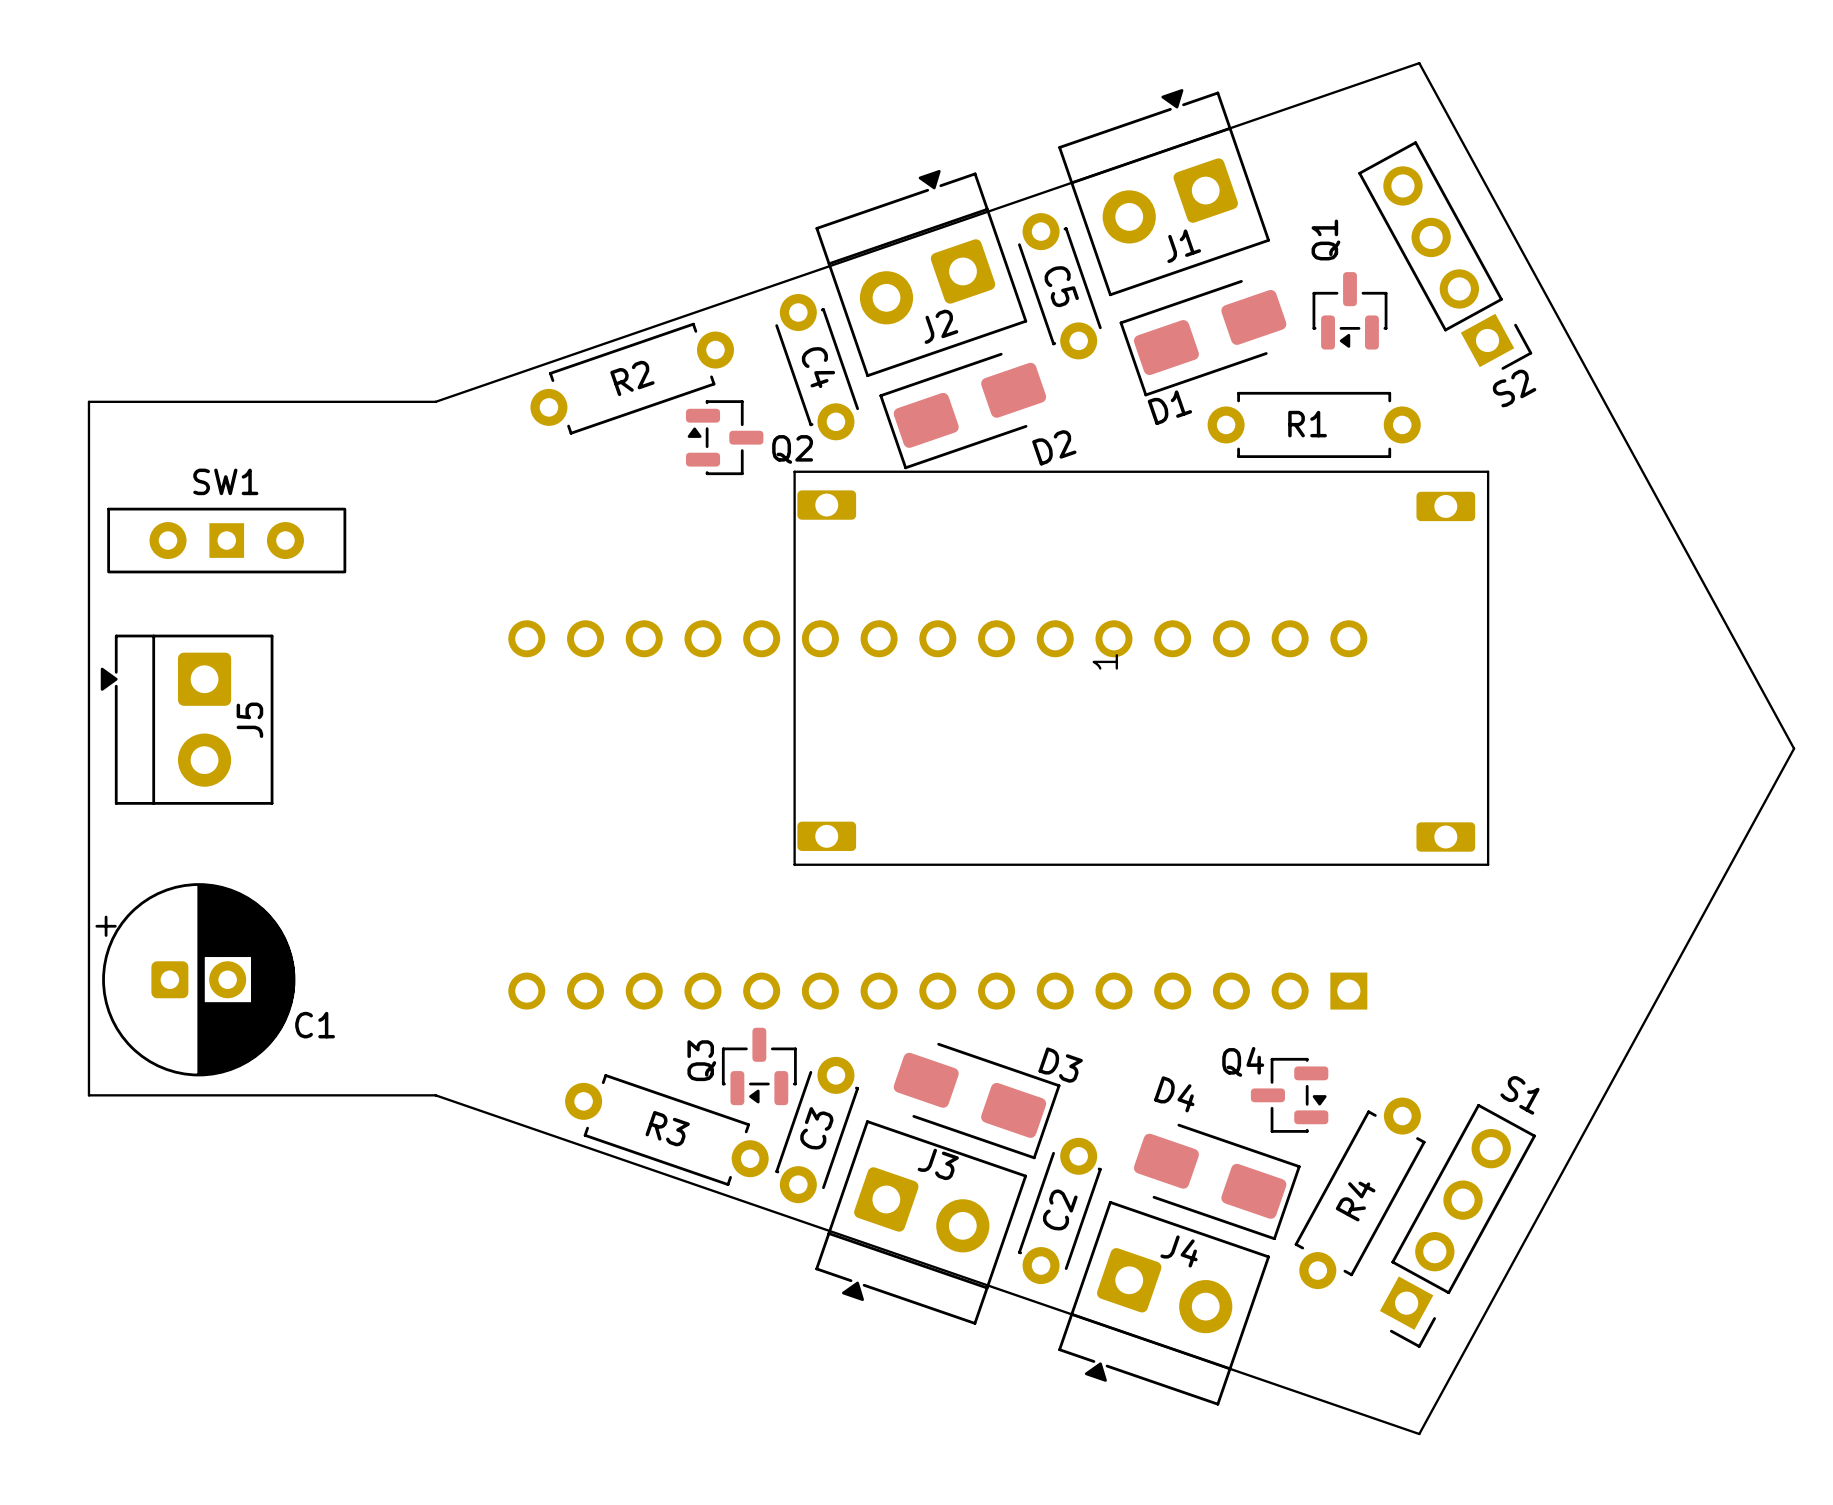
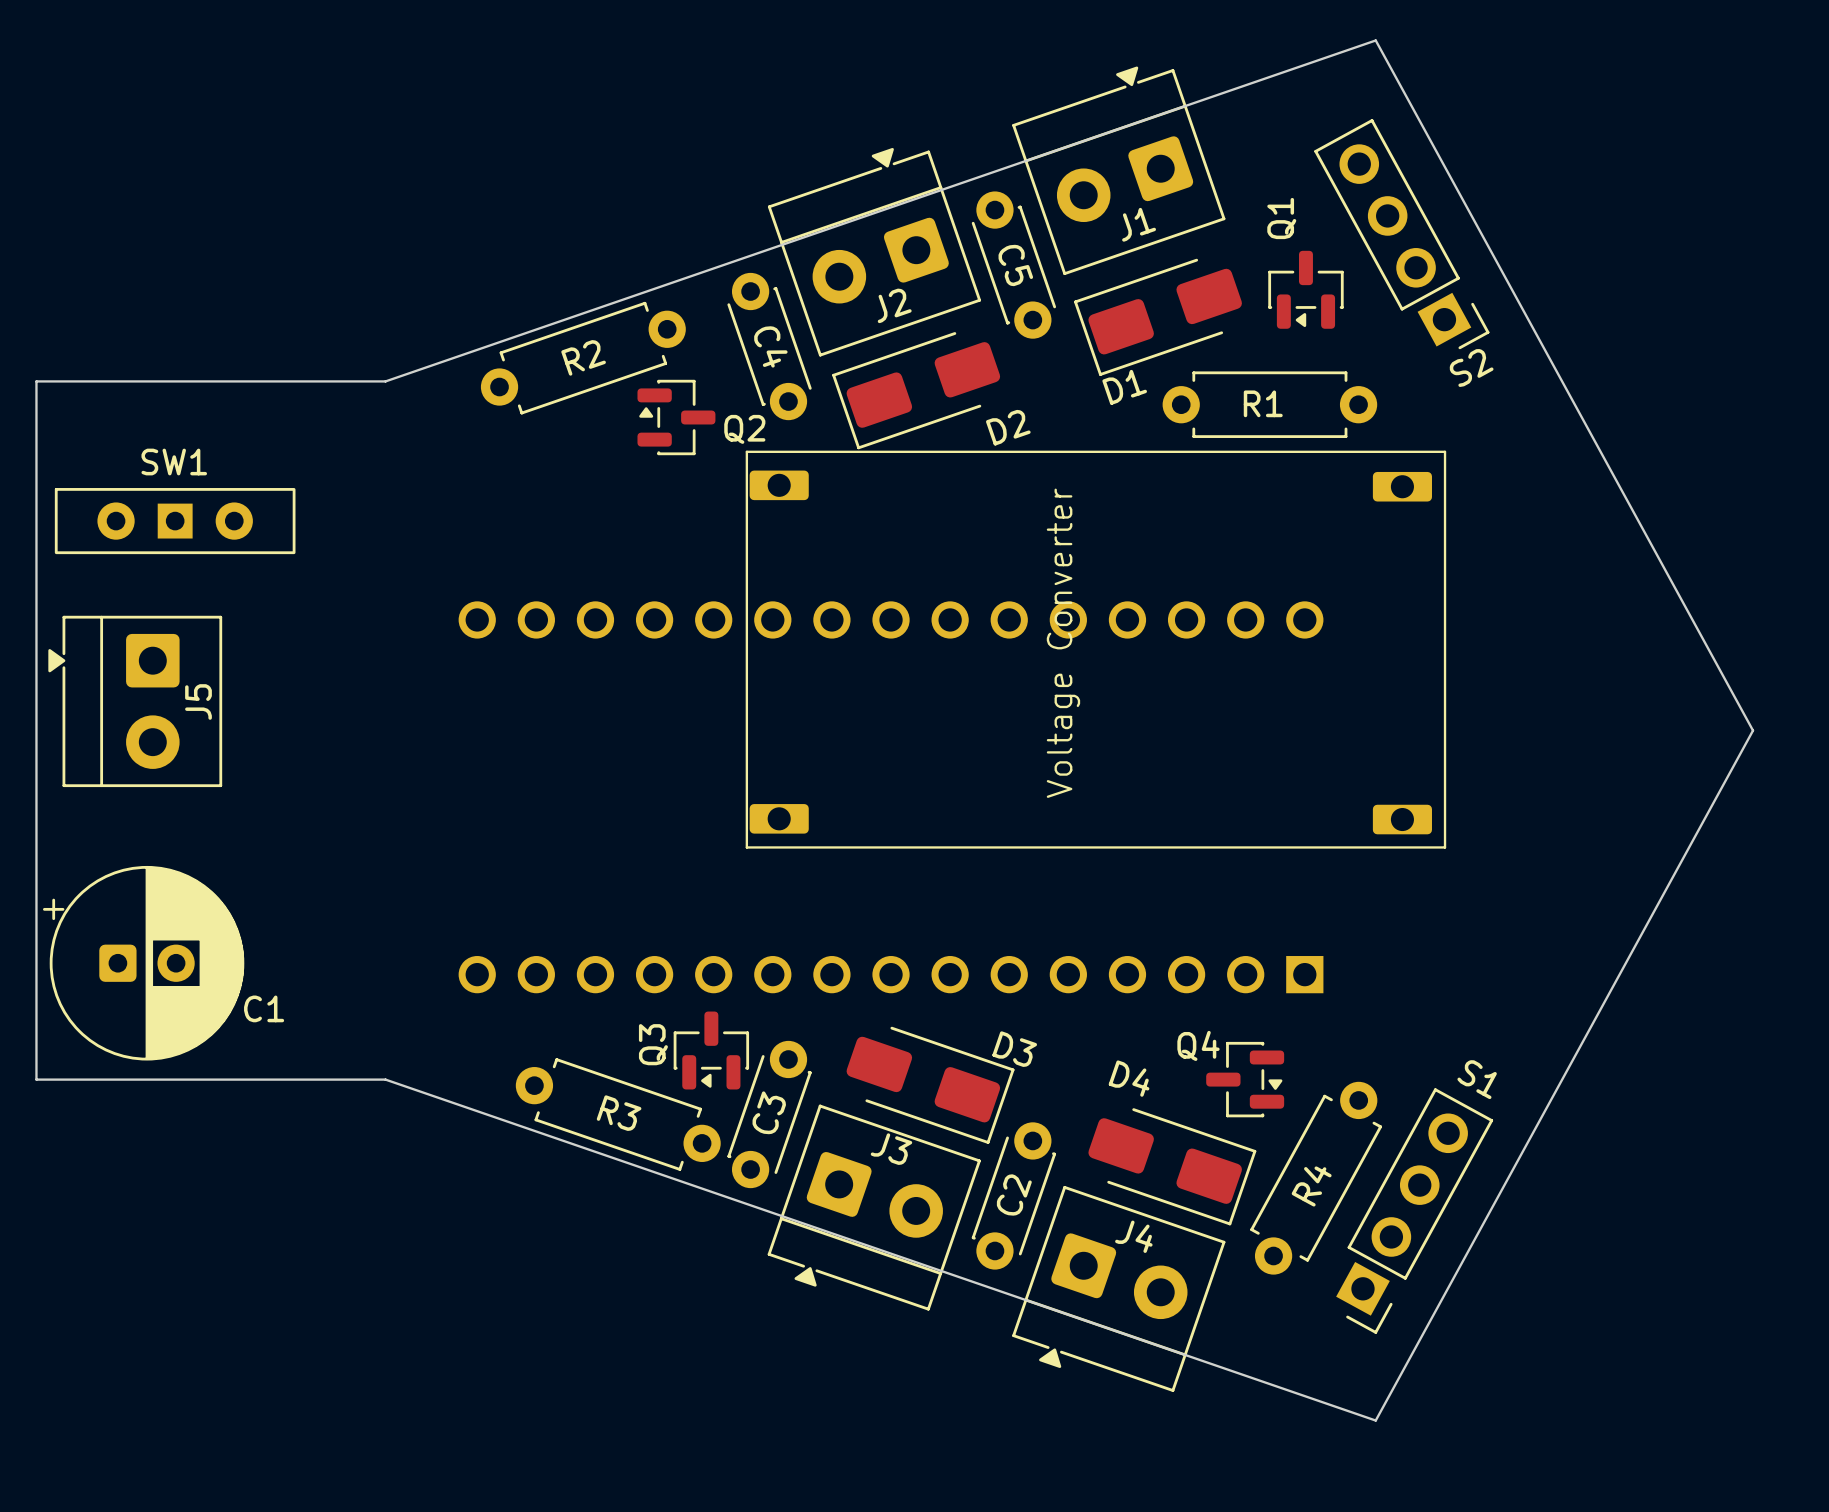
1 name: 1 (1105, 661) -> Voltage Converter (1063, 643)

